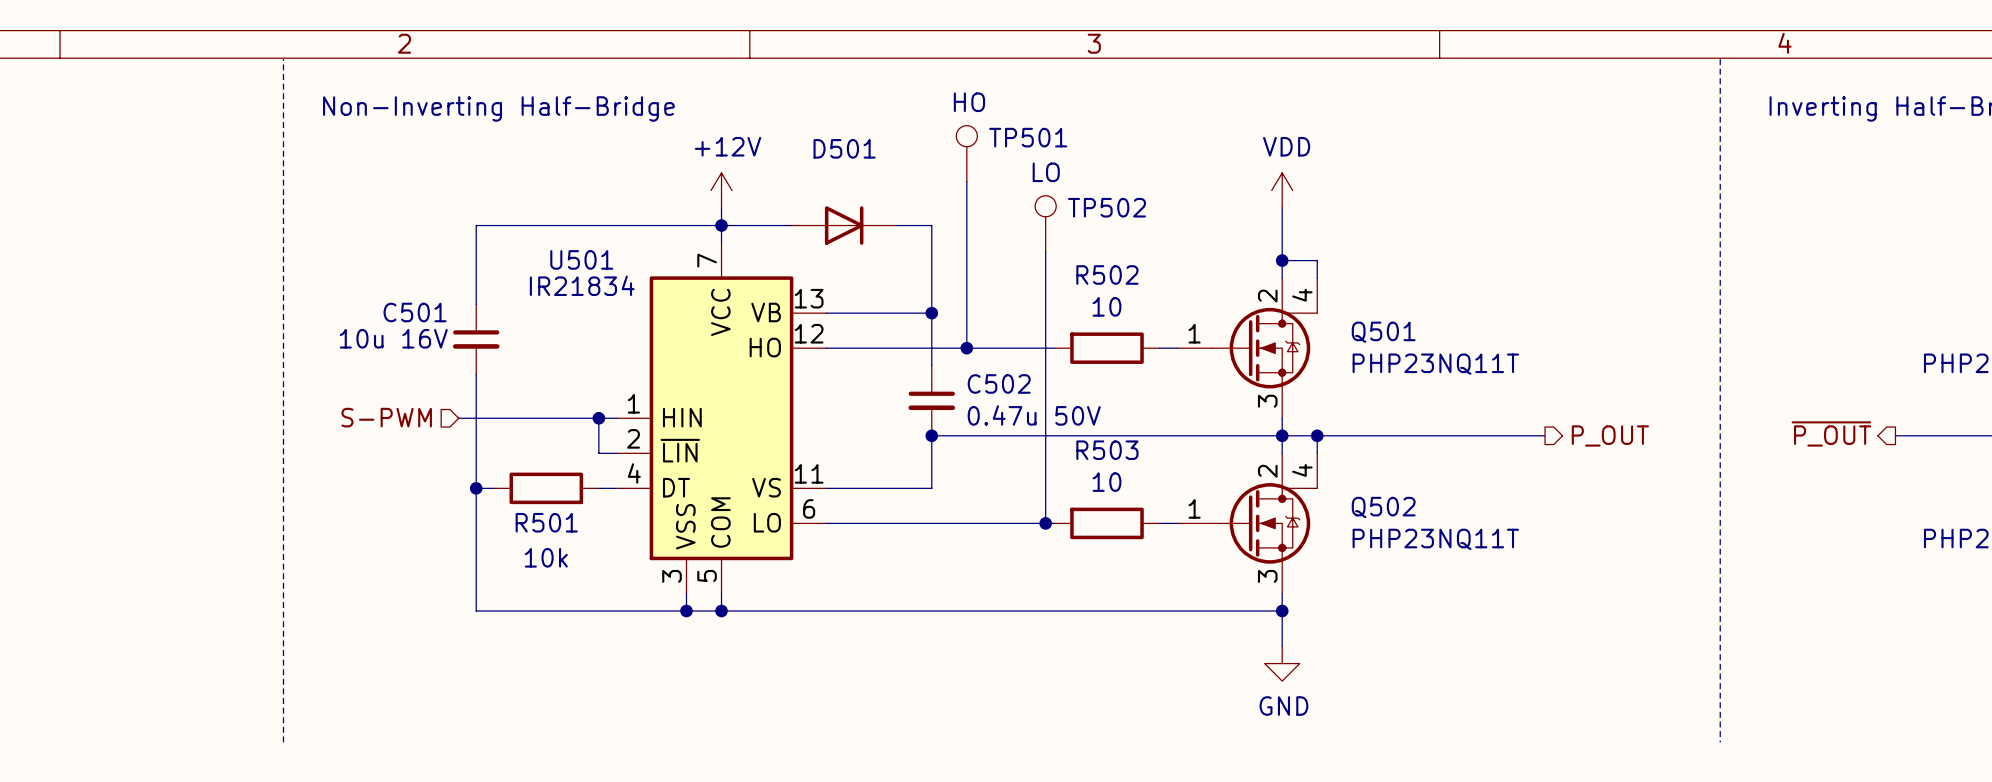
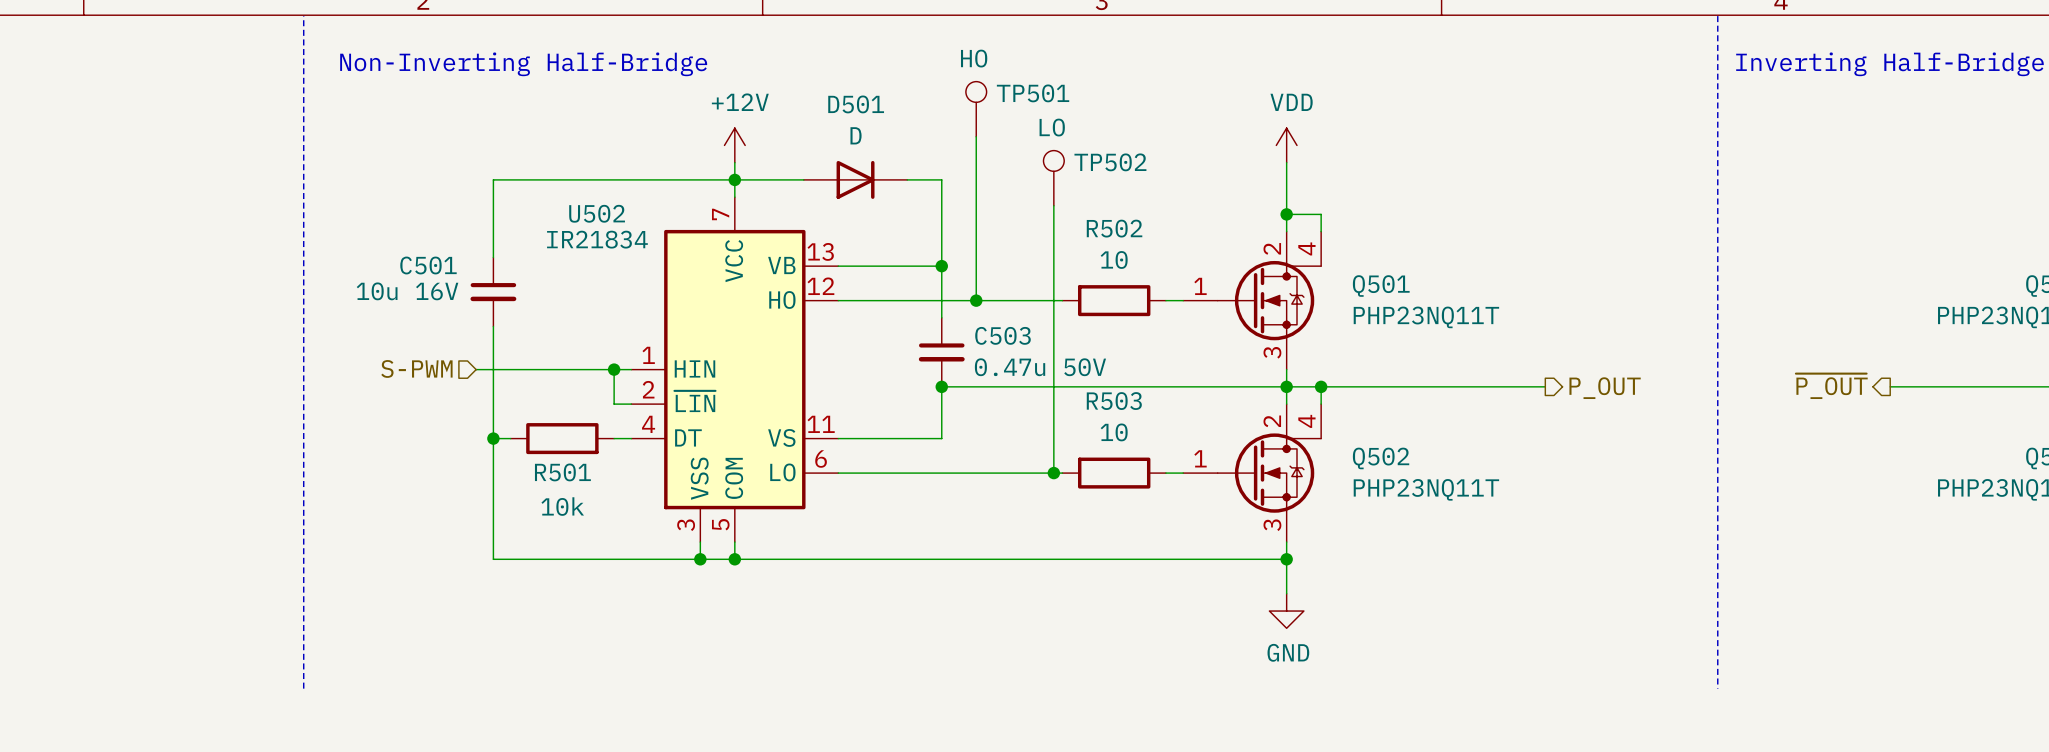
D501 value: none -> D (856, 135)
U501 name: U501 (581, 259) -> U502 (597, 213)
C502 name: C502 (999, 383) -> C503 (1002, 335)

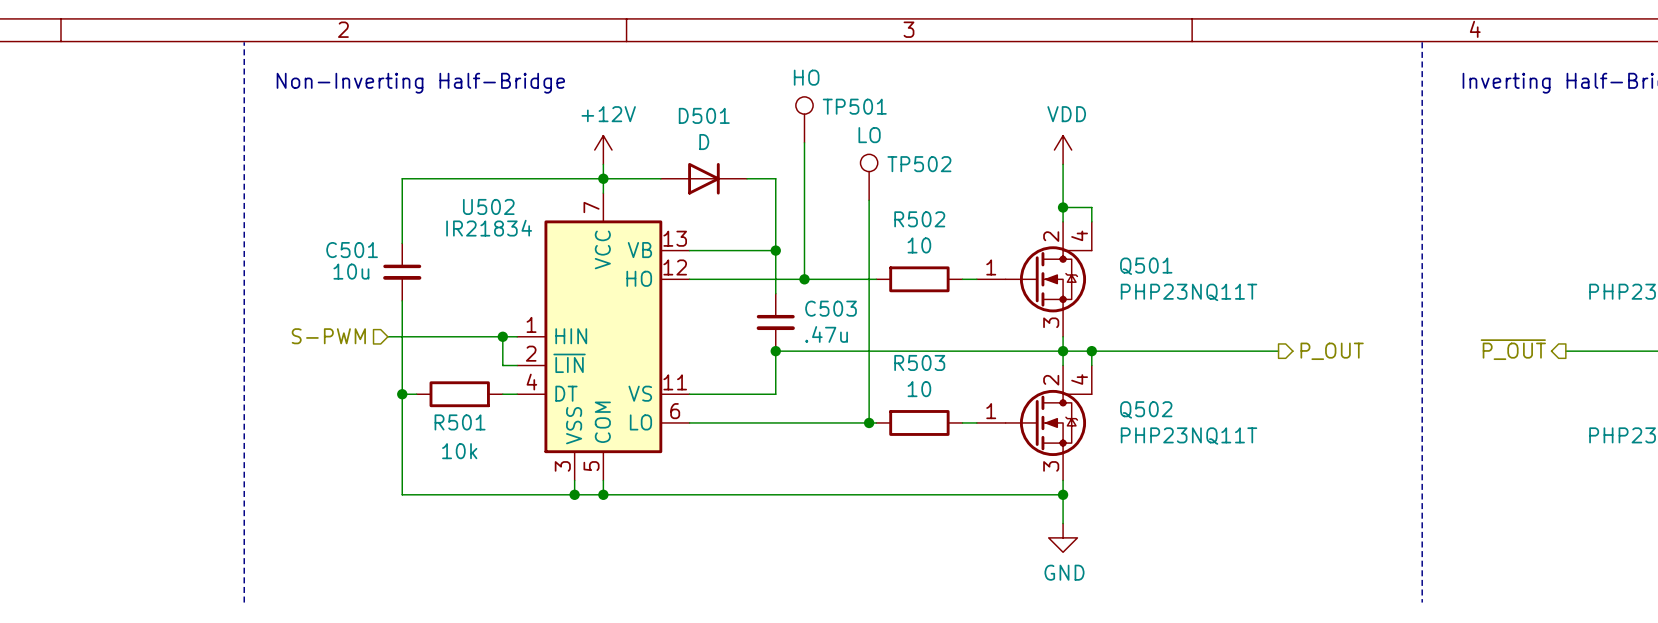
C501 value: 10u 16V (407, 291) -> 10u (351, 271)
C503 value: 0.47u 50V (1040, 367) -> .47u (826, 334)

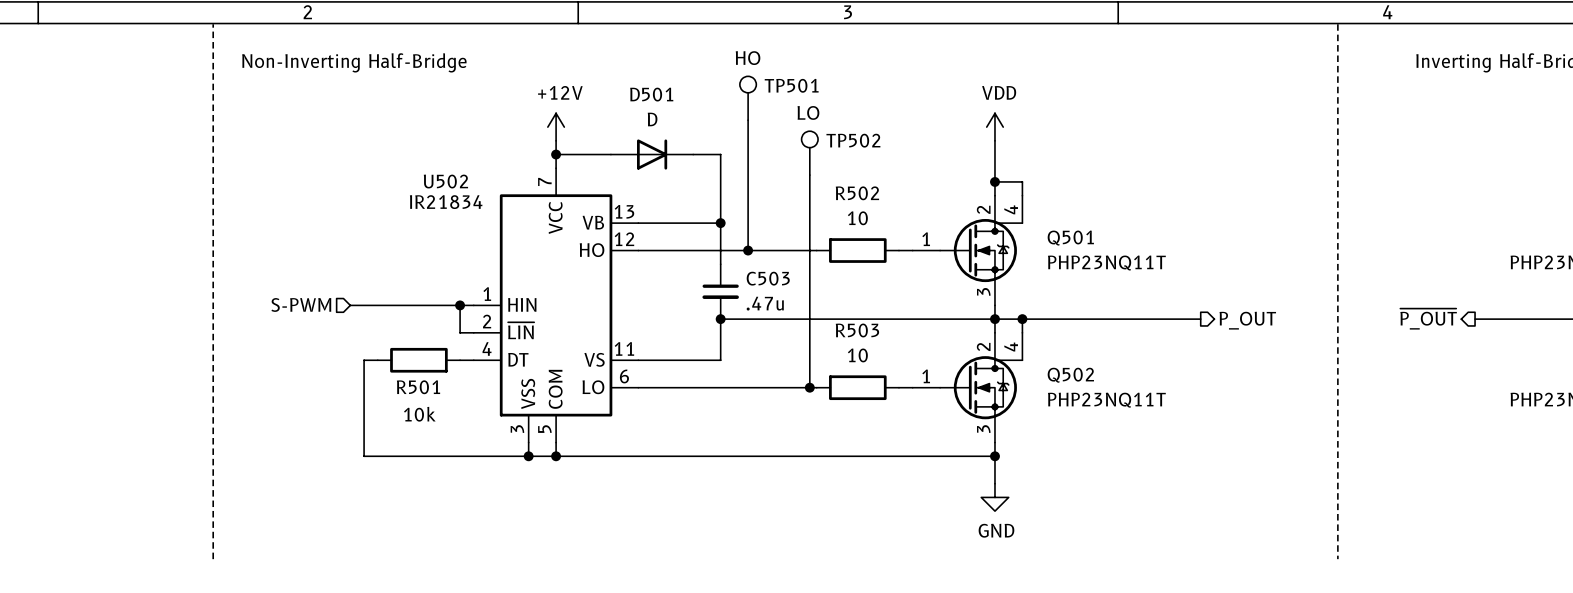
wire: (603, 178) (402, 178) (402, 243) -> none
C501: 10u (402, 272) -> none
wire: (402, 300) (402, 394) -> none
junction: (402, 394) -> none

